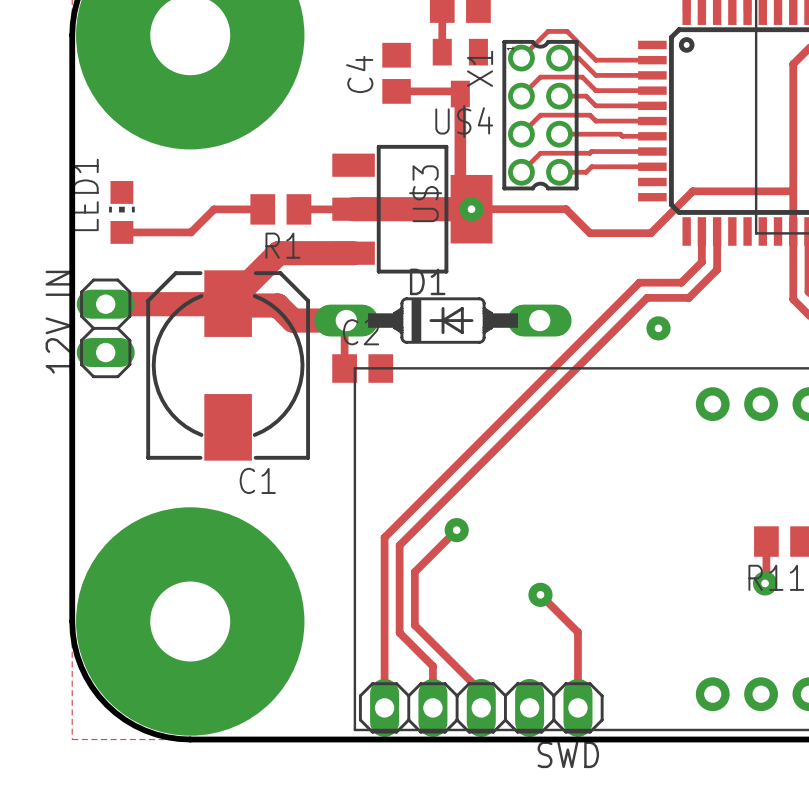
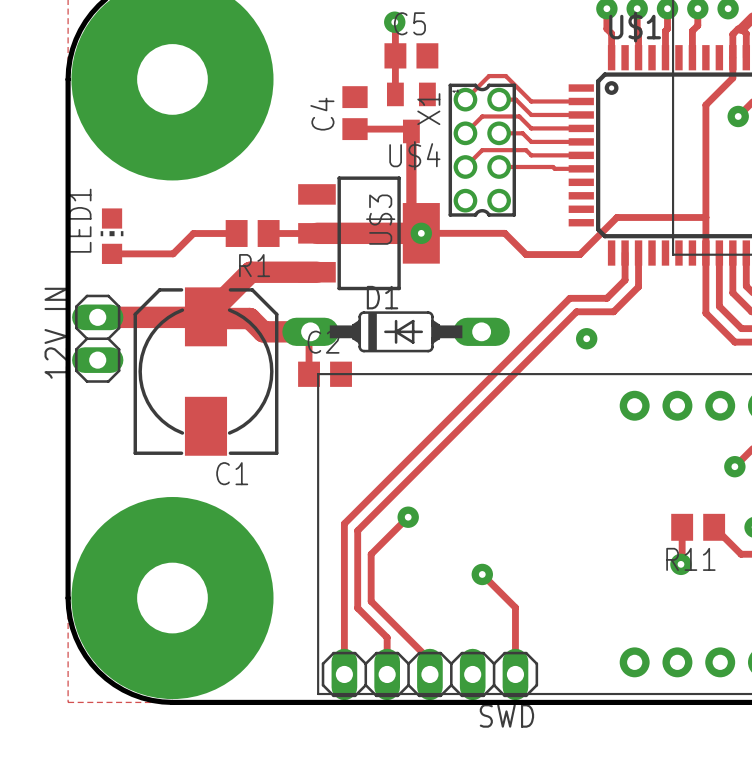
track: (652, 151) (540, 153) (521, 172) -> none
track: (652, 166) (591, 166) (586, 172) (559, 172) -> none

